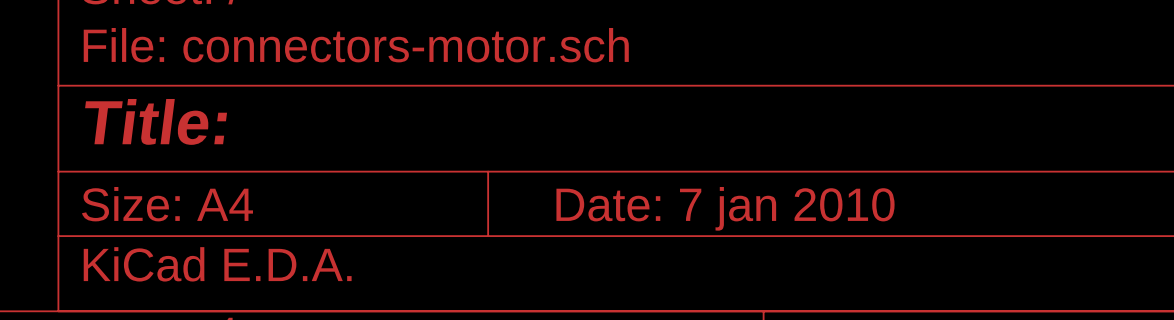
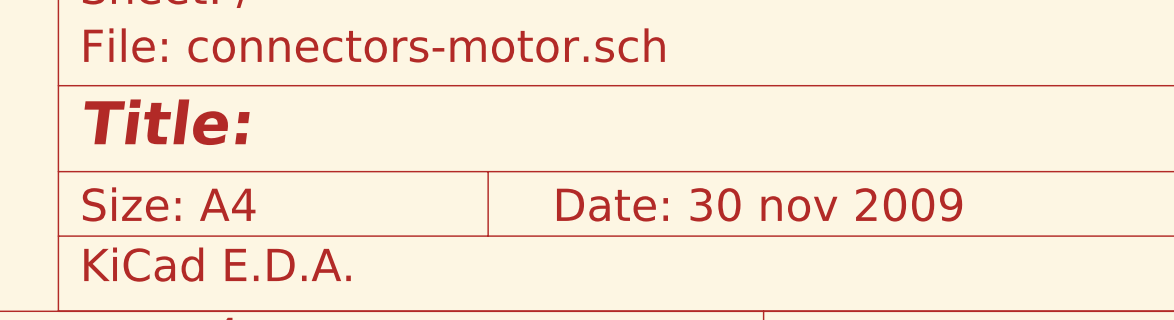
title block: Date: 7 jan 2010 (725, 208) -> Date: 30 nov 2009 (759, 204)

